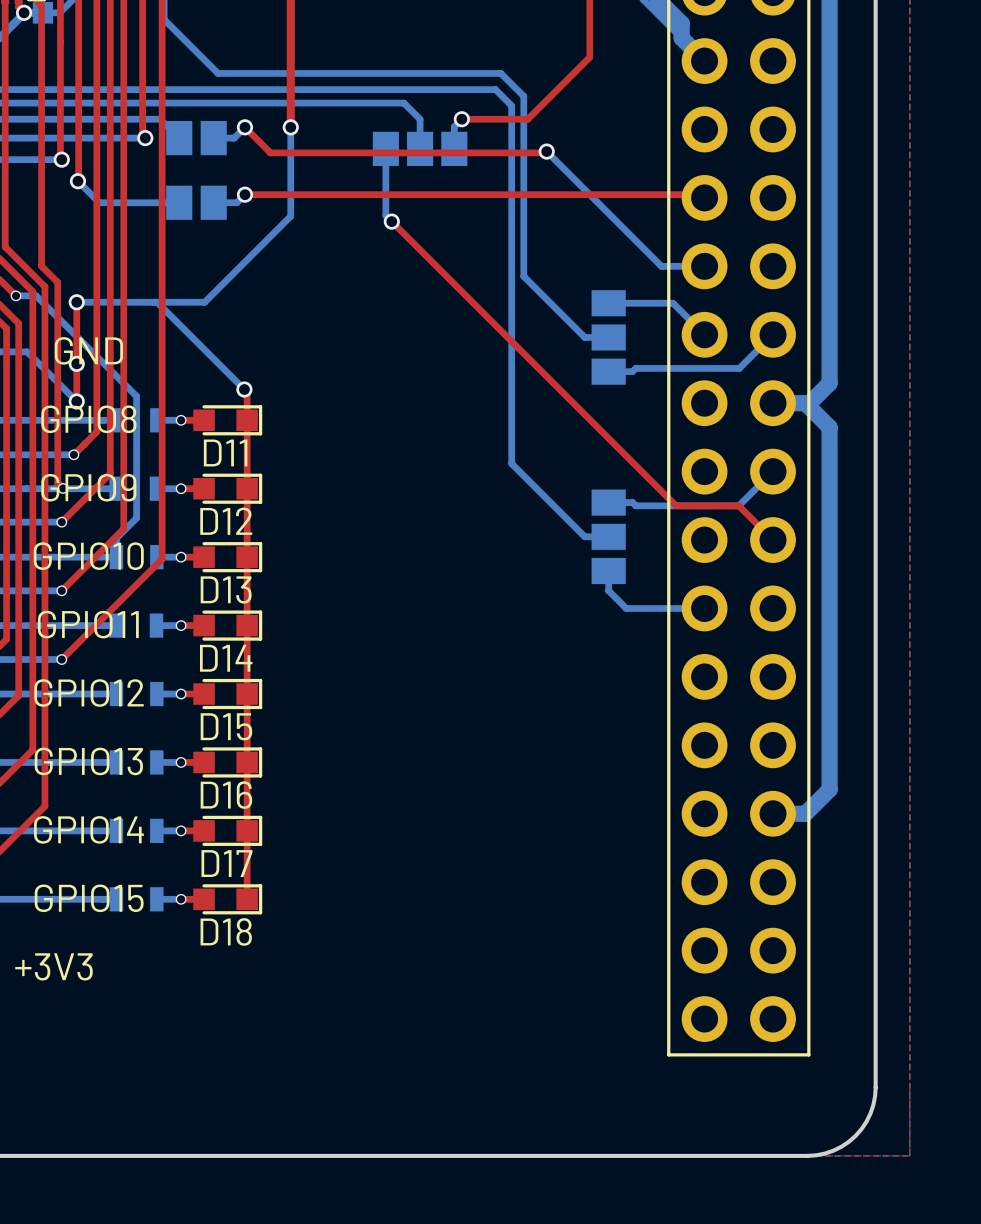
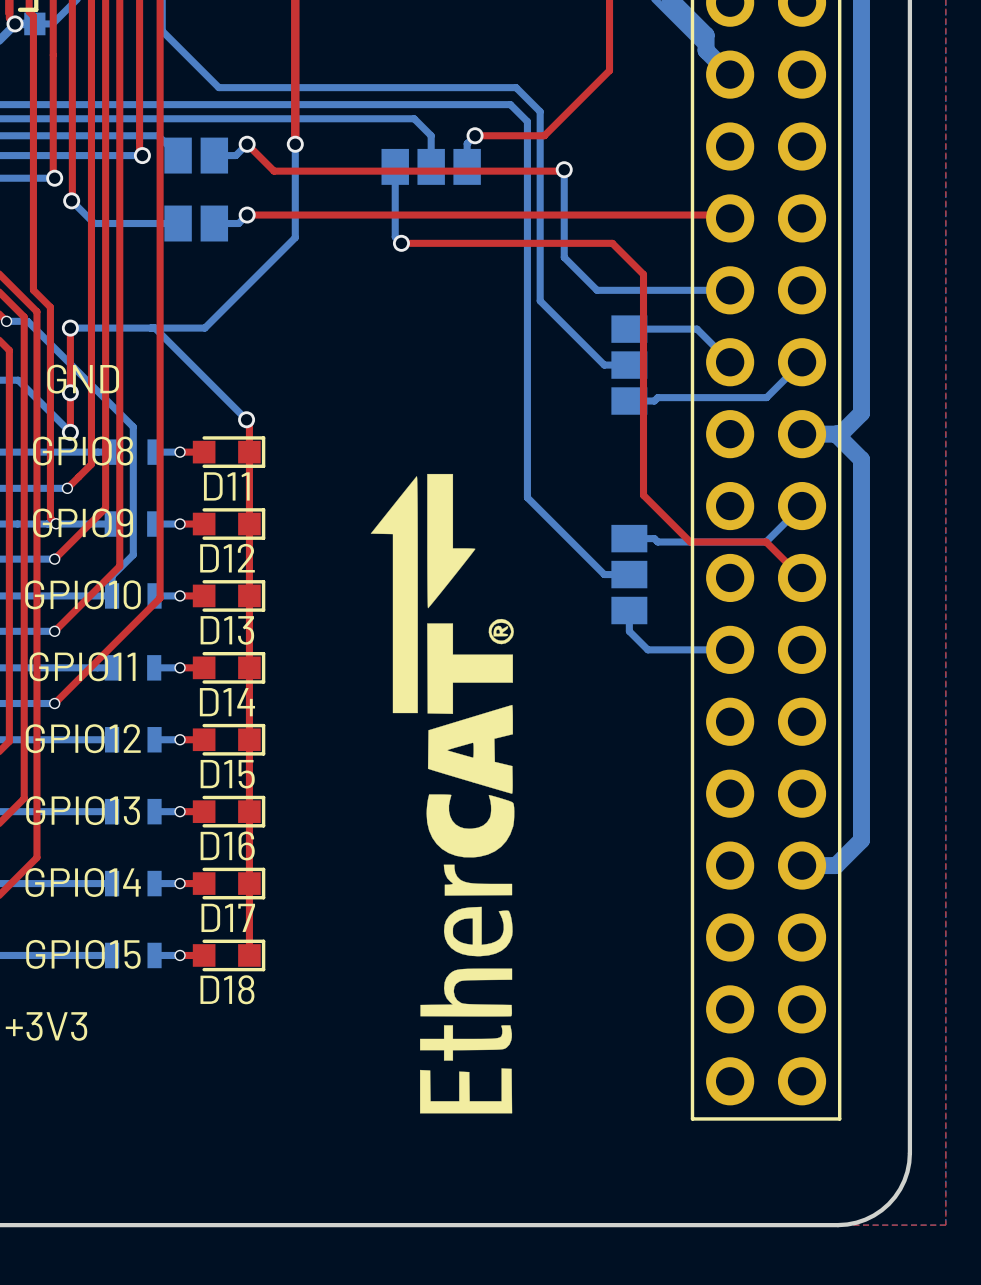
bottom track: (546, 151) (661, 266) -> (564, 169) (564, 257) (597, 290) (684, 290)
top track: (395, 225) (676, 505) -> (401, 243) (612, 243) (643, 274) (643, 495) (690, 542) (700, 542)
drawing: none -> [370, 473, 515, 1114]

